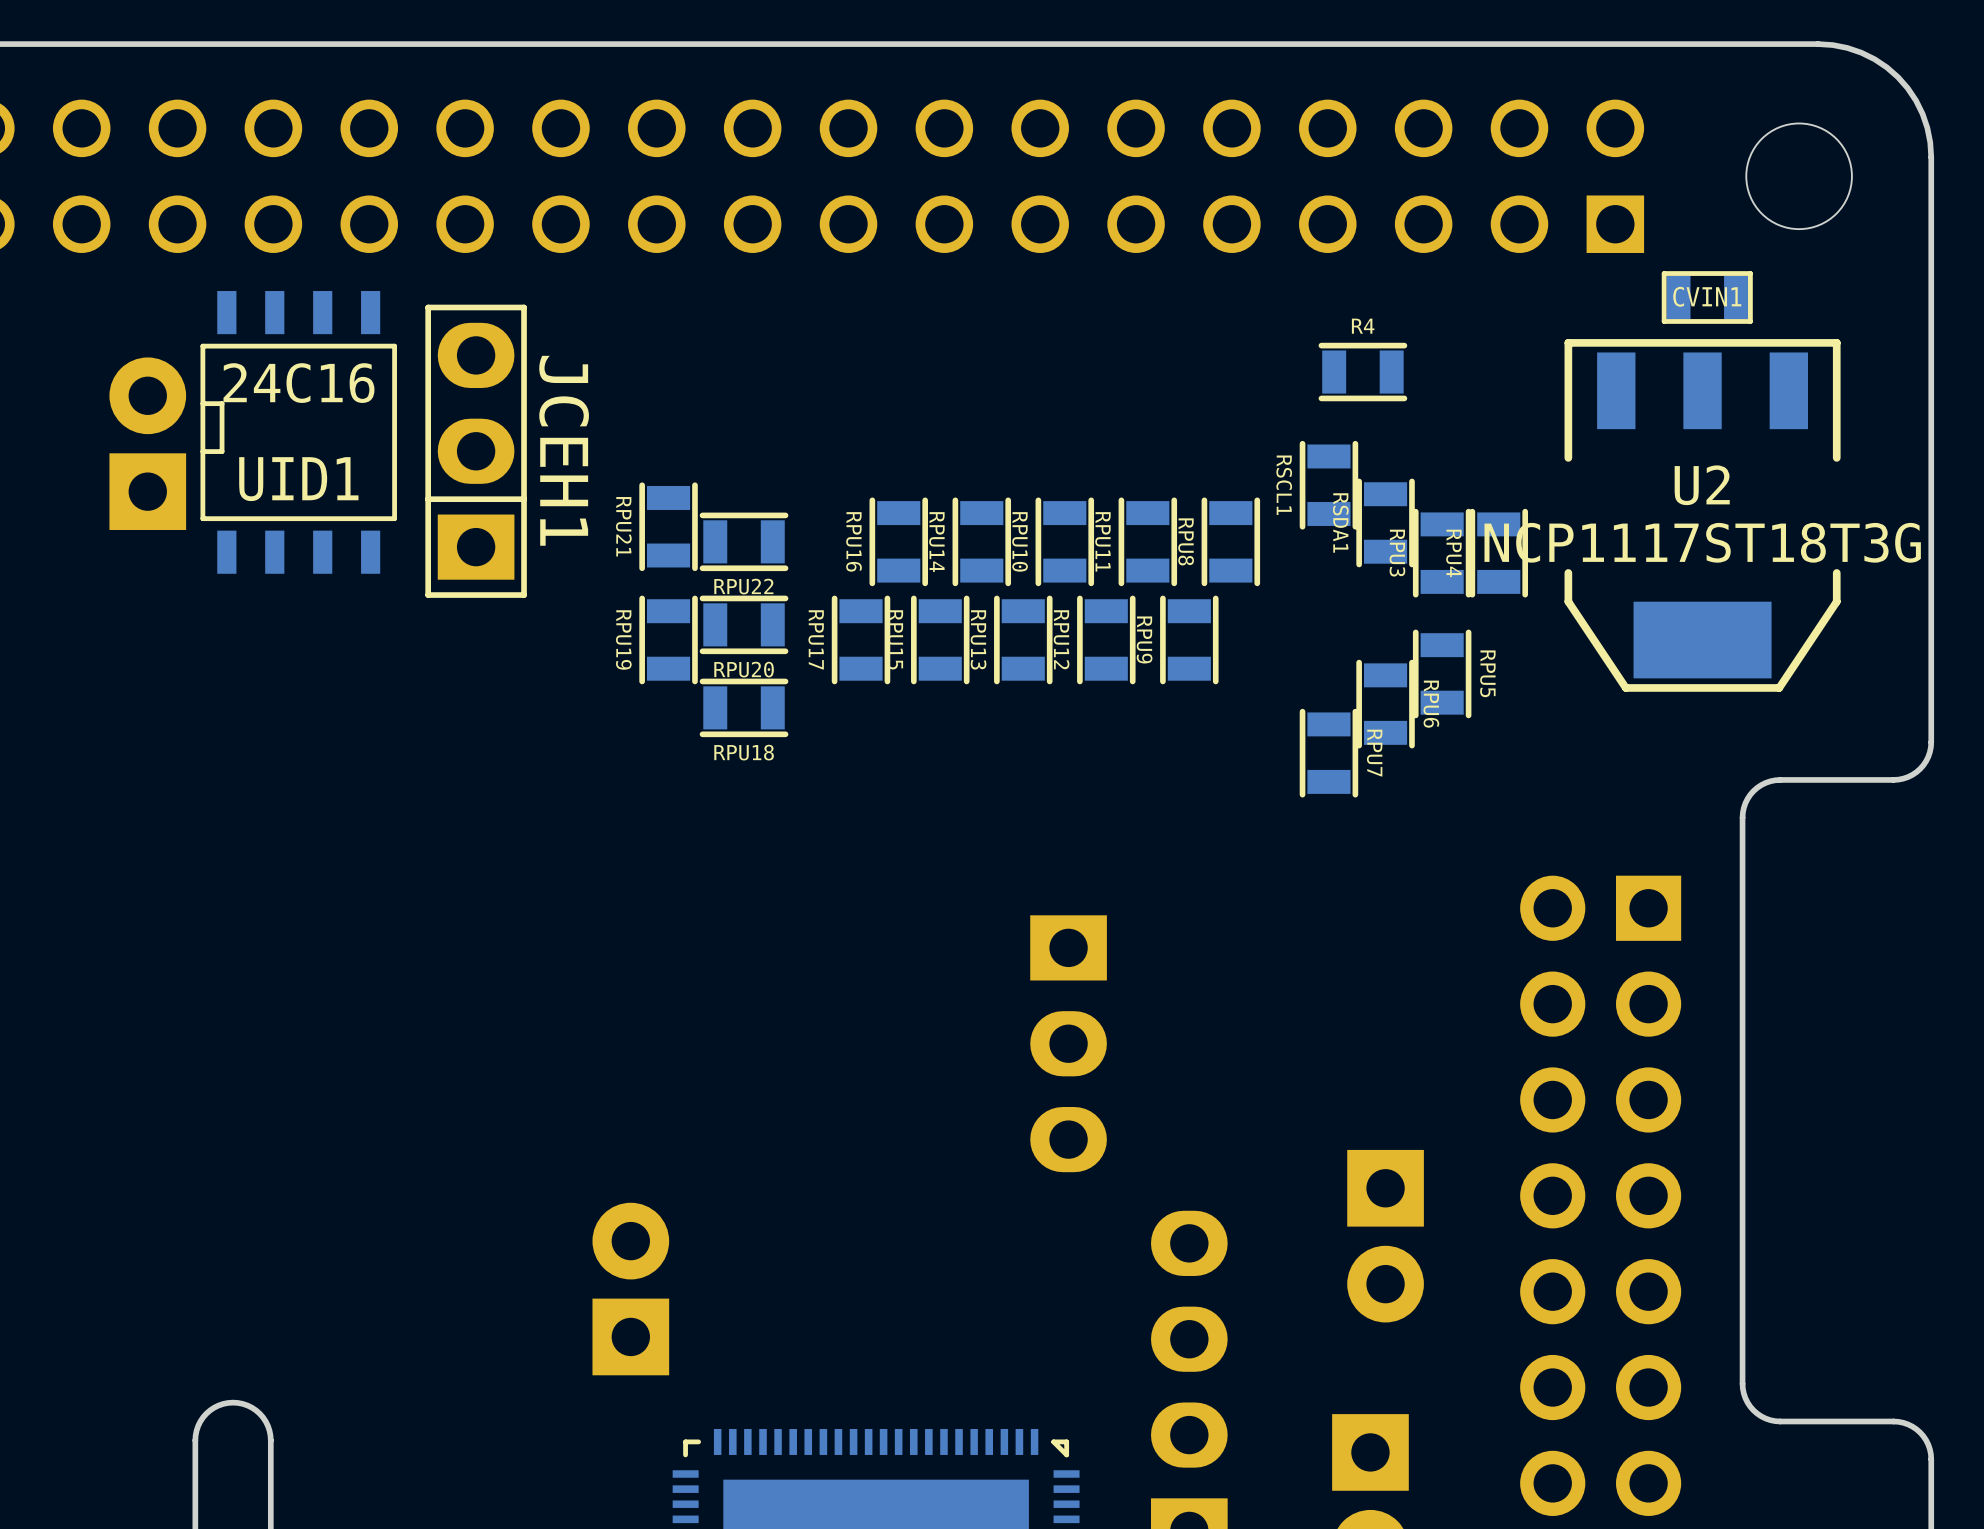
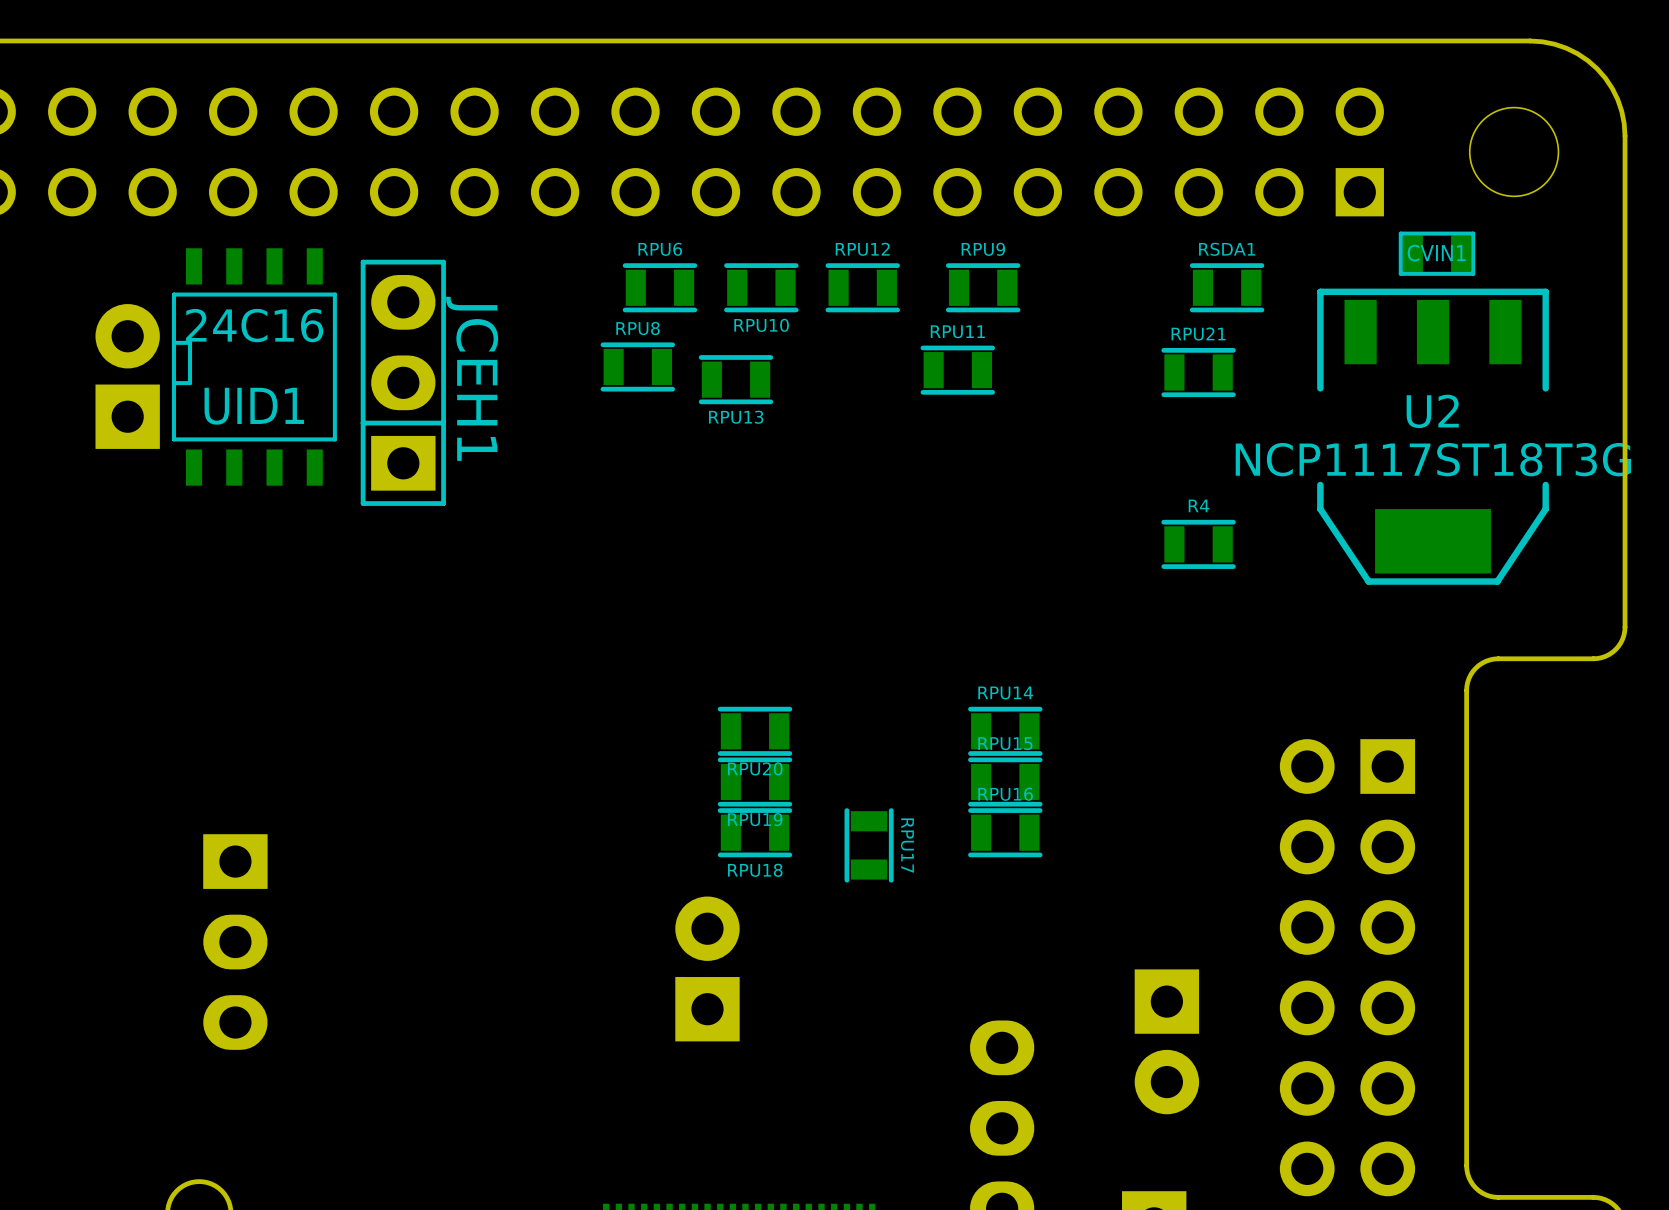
R4 position: (1362, 372) -> (1198, 544)
RSCL1: (1328, 485) -> none
RSDA1 rotation: 0° (1385, 522) -> 90° clockwise (1227, 287)
RSDA1 position: (1385, 522) -> (1227, 287)
RPU21 rotation: 0° (668, 526) -> 90° clockwise (1198, 372)
RPU21 position: (668, 526) -> (1198, 372)
RPU22: (744, 541) -> none
RPU16 rotation: 0° (898, 541) -> 90° clockwise (1005, 832)
RPU16 position: (898, 541) -> (1005, 832)
RPU14 rotation: 0° (981, 541) -> 90° clockwise (1005, 731)
RPU14 position: (981, 541) -> (1005, 731)
RPU10 rotation: 0° (1064, 541) -> 90° clockwise (761, 287)
RPU10 position: (1064, 541) -> (761, 287)
RPU11 rotation: 0° (1147, 541) -> 90° clockwise (957, 370)
RPU11 position: (1147, 541) -> (957, 370)
RPU8 rotation: 0° (1230, 541) -> 90° clockwise (637, 366)
RPU8 position: (1230, 541) -> (637, 366)
RPU3: (1442, 553) -> none
RPU4: (1498, 553) -> none
RPU20 position: (744, 624) -> (755, 731)
RPU19 rotation: 0° (668, 639) -> 90° clockwise (755, 782)
RPU19 position: (668, 639) -> (755, 782)
RPU17 name position: RPU17 (816, 639) -> RPU17 (907, 845)
RPU17 position: (861, 639) -> (869, 845)
RPU15 rotation: 0° (940, 639) -> 90° clockwise (1005, 782)
RPU15 position: (940, 639) -> (1005, 782)
RPU13 rotation: 0° (1023, 639) -> 90° clockwise (736, 379)
RPU13 position: (1023, 639) -> (736, 379)
RPU12 rotation: 0° (1106, 639) -> 90° clockwise (862, 287)
RPU12 position: (1106, 639) -> (862, 287)
RPU9 rotation: 0° (1189, 639) -> 90° clockwise (983, 287)
RPU9 position: (1189, 639) -> (983, 287)
RPU5: (1442, 673) -> none
RPU6 rotation: 0° (1385, 704) -> 90° clockwise (659, 287)
RPU6 position: (1385, 704) -> (659, 287)
RPU18 position: (744, 707) -> (755, 832)
RPU7: (1328, 753) -> none
part position: (1068, 1043) -> (235, 942)
part position: (630, 1289) -> (707, 968)

